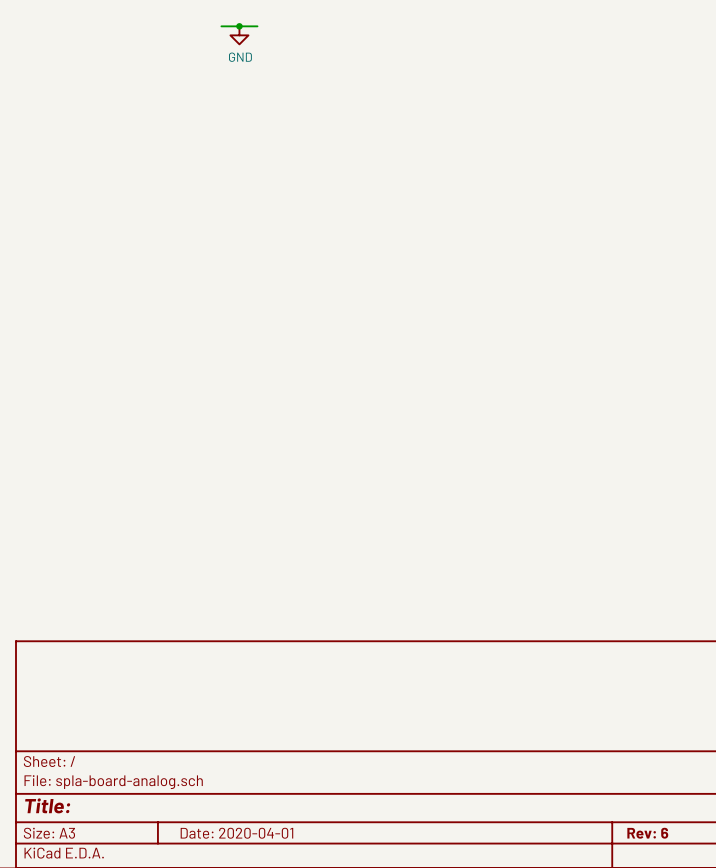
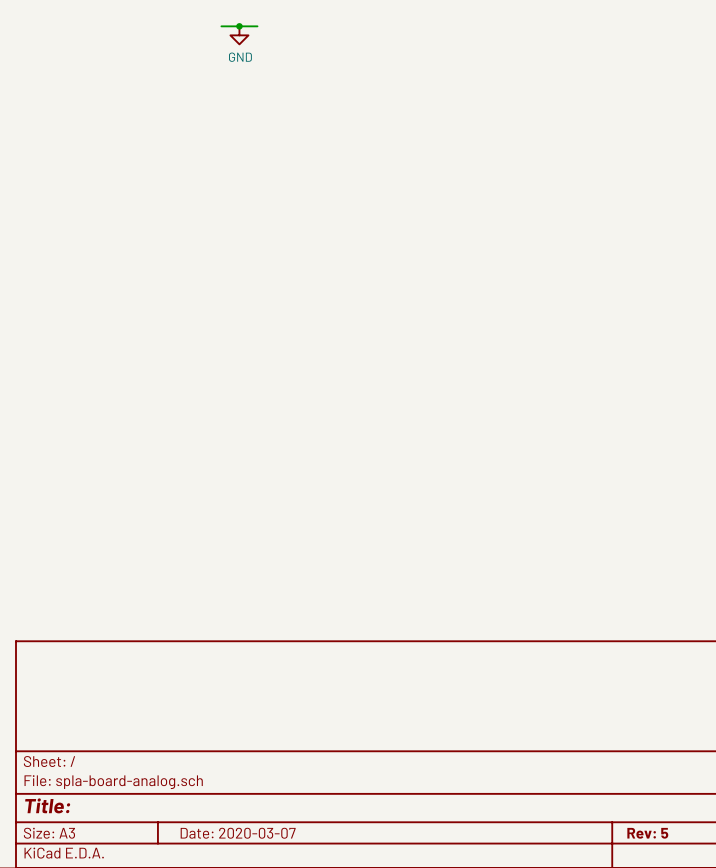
title block: Date: 2020-04-01 (236, 833) -> Date: 2020-03-07 (238, 833)
title block: Rev: 6 (647, 833) -> Rev: 5 (647, 833)

